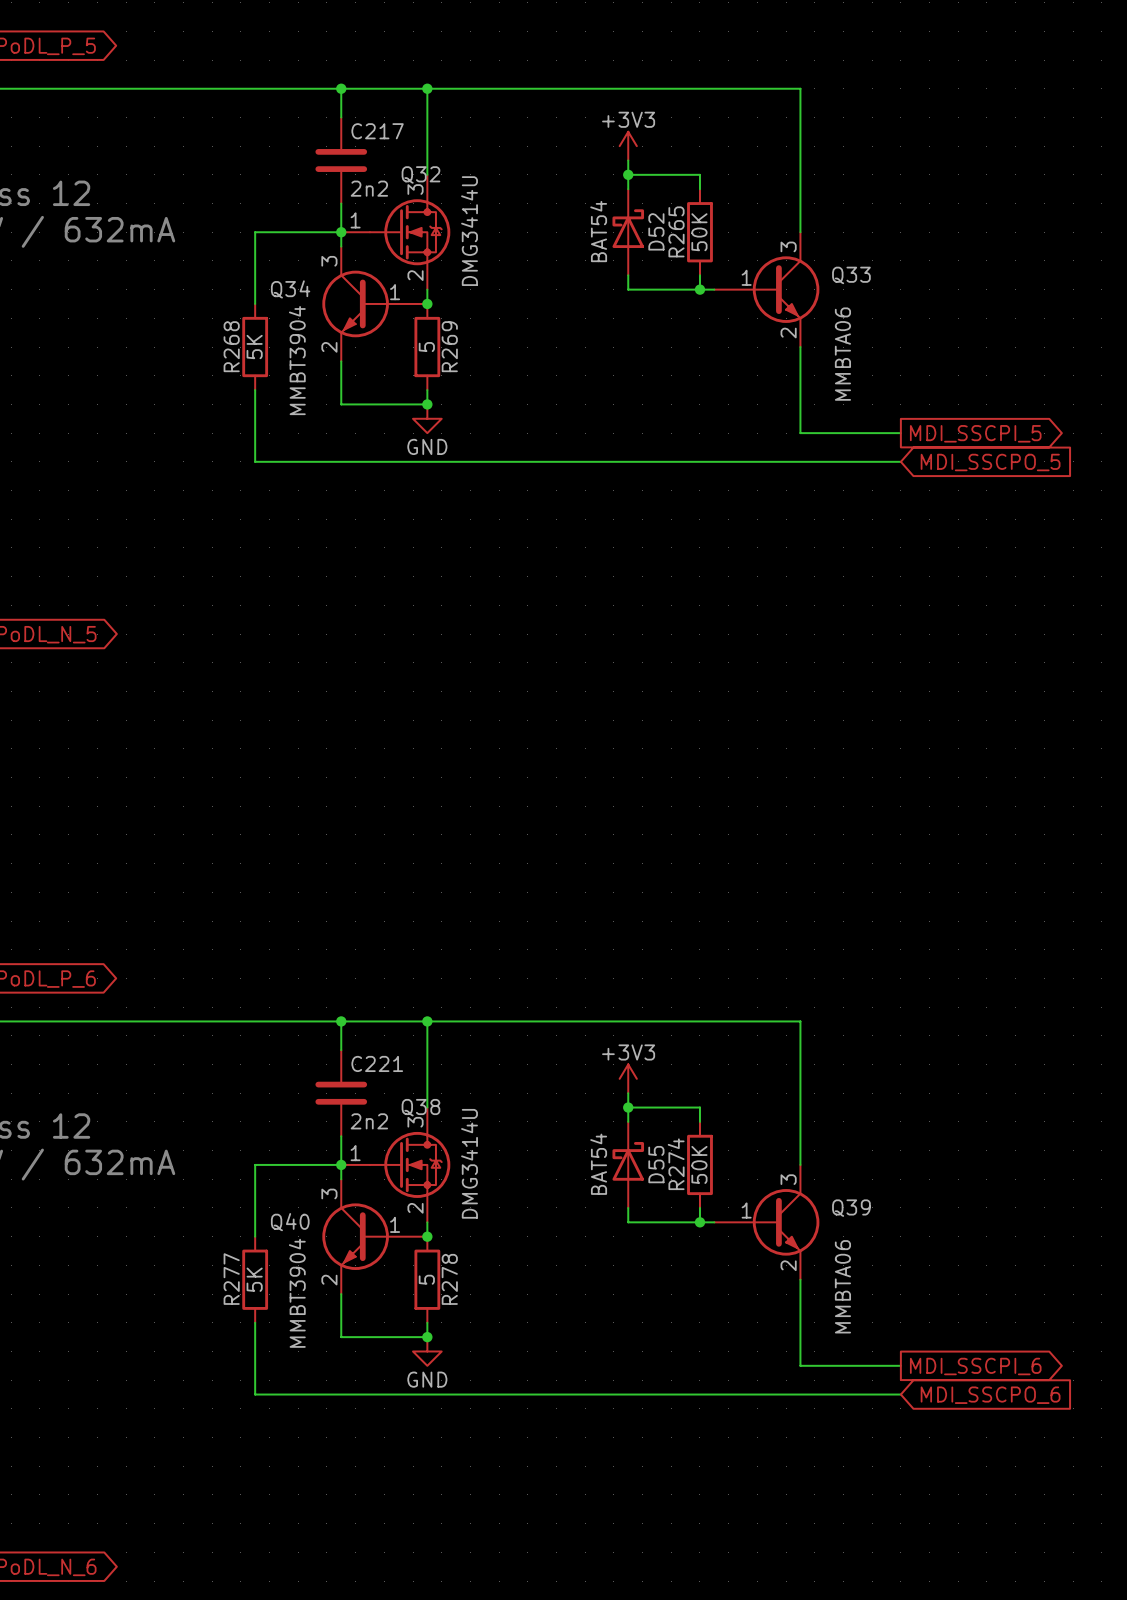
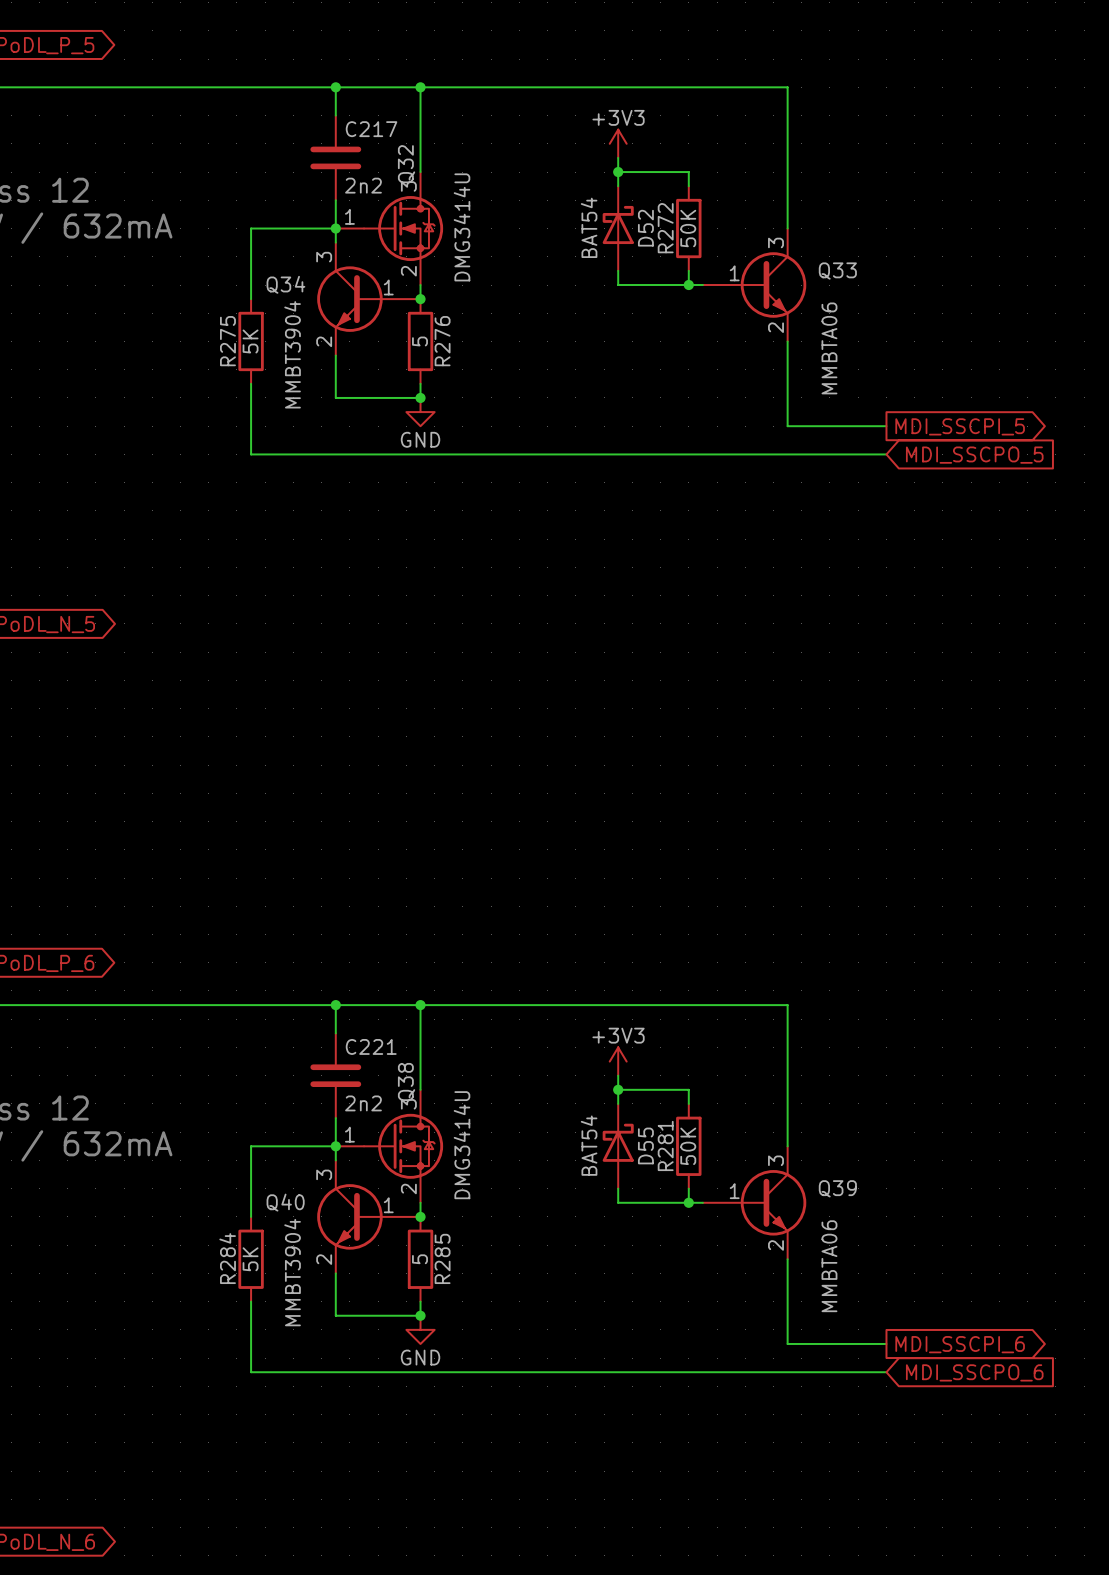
Q32 name rotation: 0° (420, 174) -> 90° counterclockwise (406, 164)
R265 name: R265 (676, 231) -> R272 (665, 228)
R268 name: R268 (231, 346) -> R275 (227, 341)
R269 name: R269 (449, 346) -> R276 (442, 341)
Q38 name rotation: 0° (420, 1107) -> 90° counterclockwise (406, 1081)
R274 name: R274 (676, 1164) -> R281 (665, 1145)
R277 name: R277 (231, 1279) -> R284 (227, 1258)
R278 name: R278 (449, 1279) -> R285 (442, 1258)

